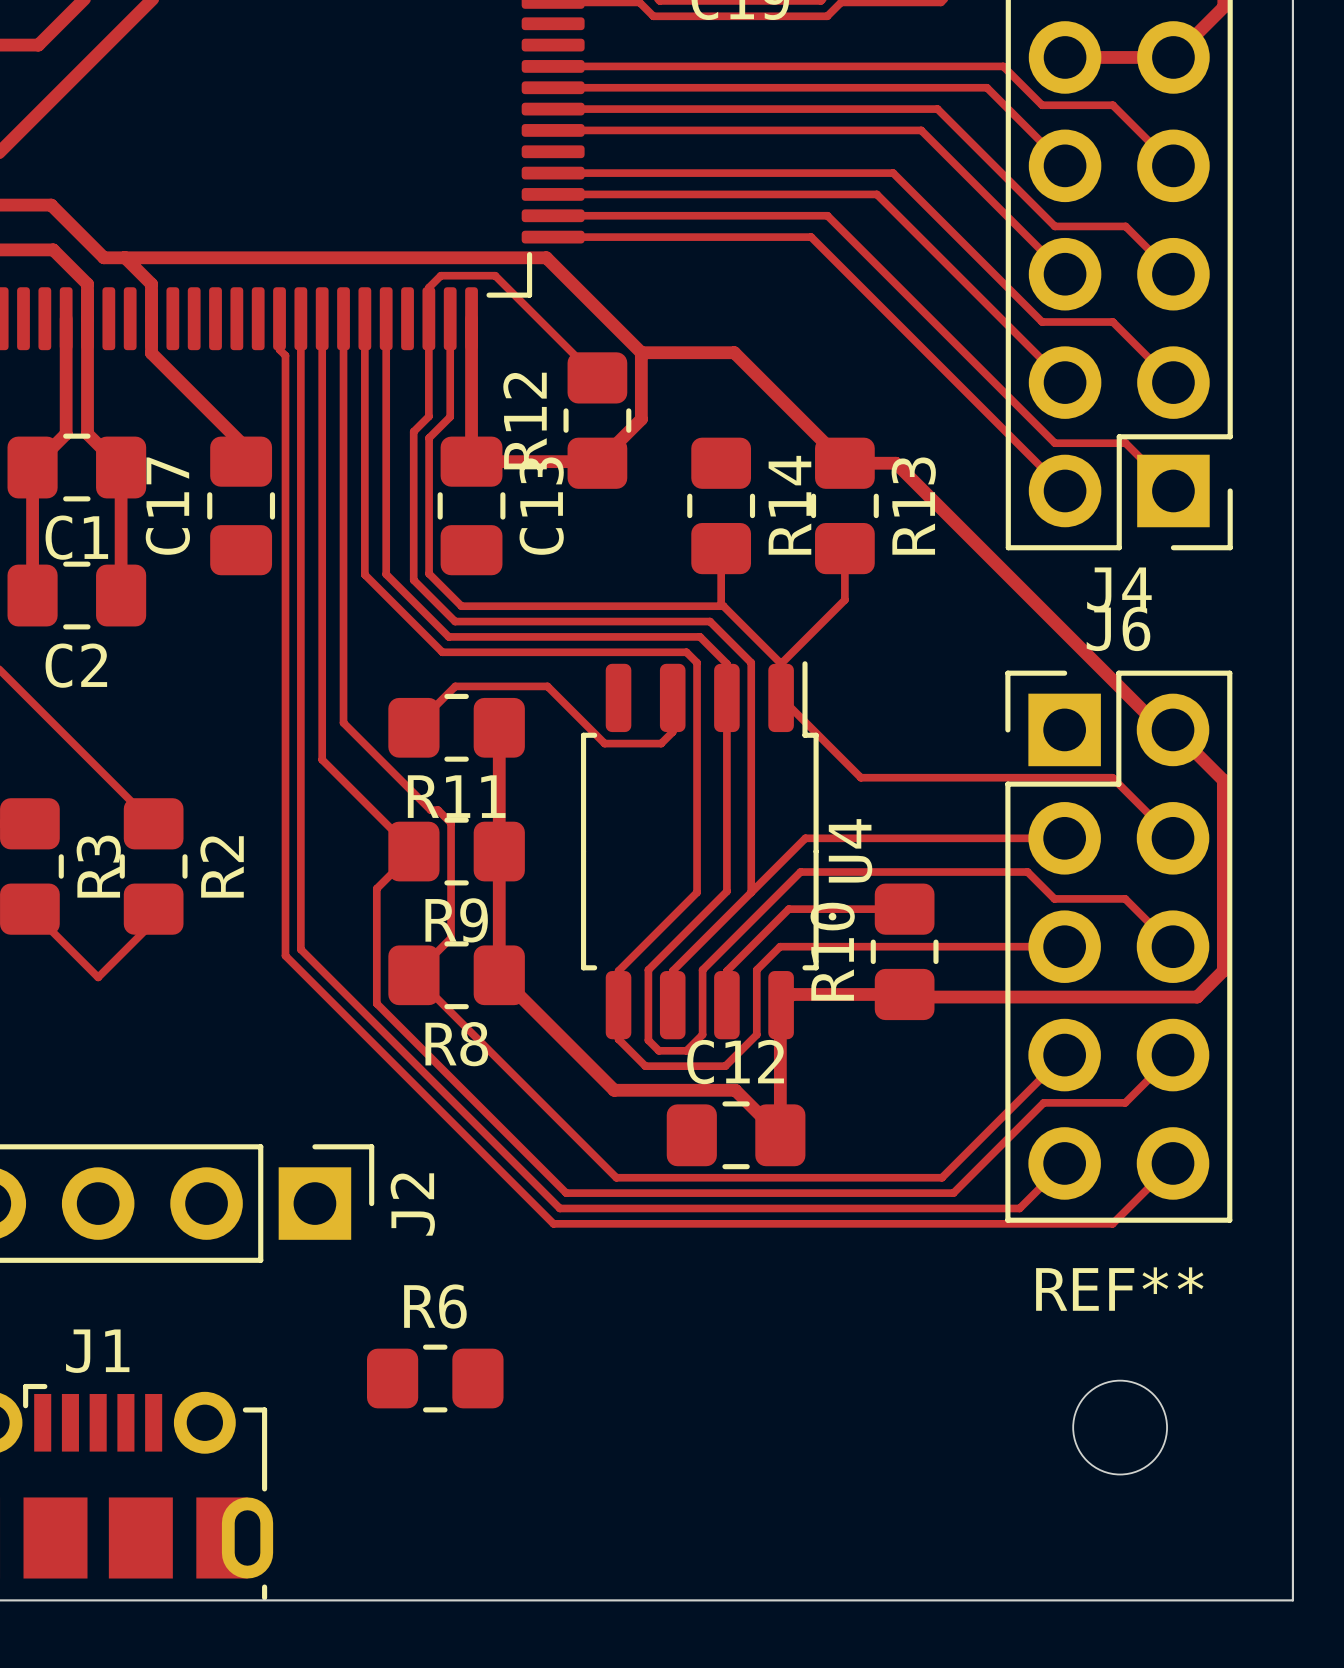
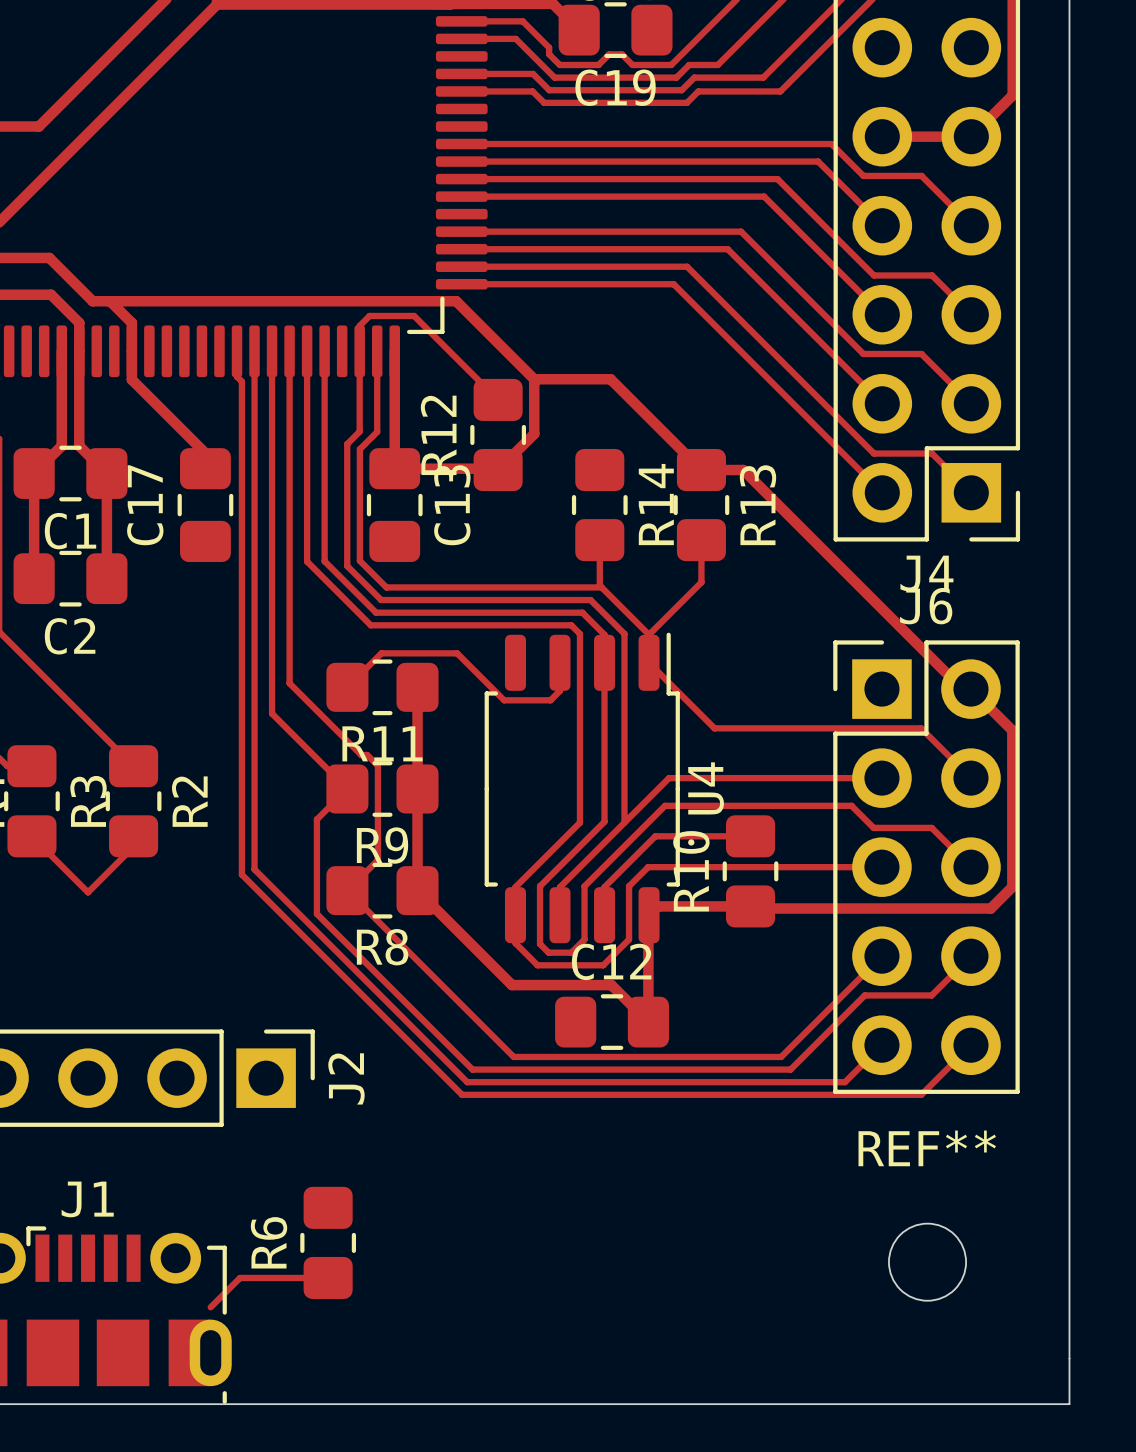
R6 name position: R6 (435, 1306) -> R6 (269, 1242)
R6 rotation: 0° (435, 1378) -> 90° clockwise (328, 1242)
top track: none -> (328, 1277) (240, 1277) (210, 1307)

